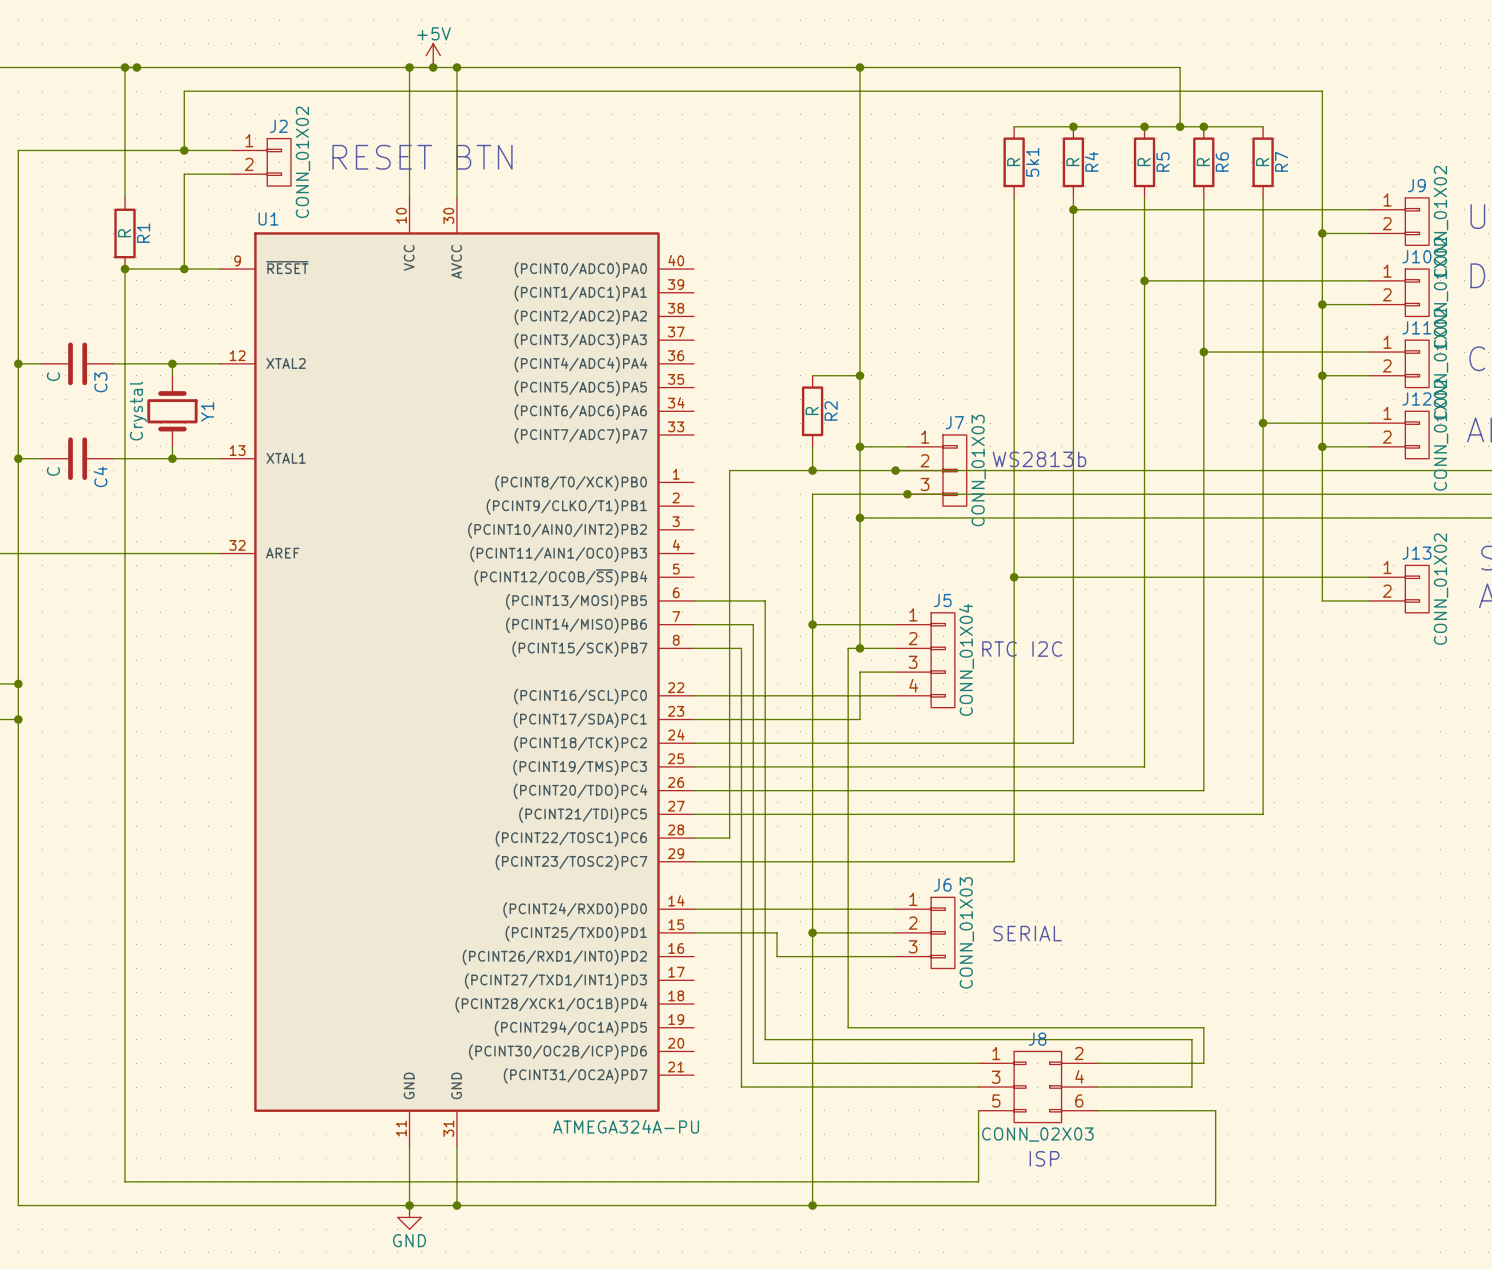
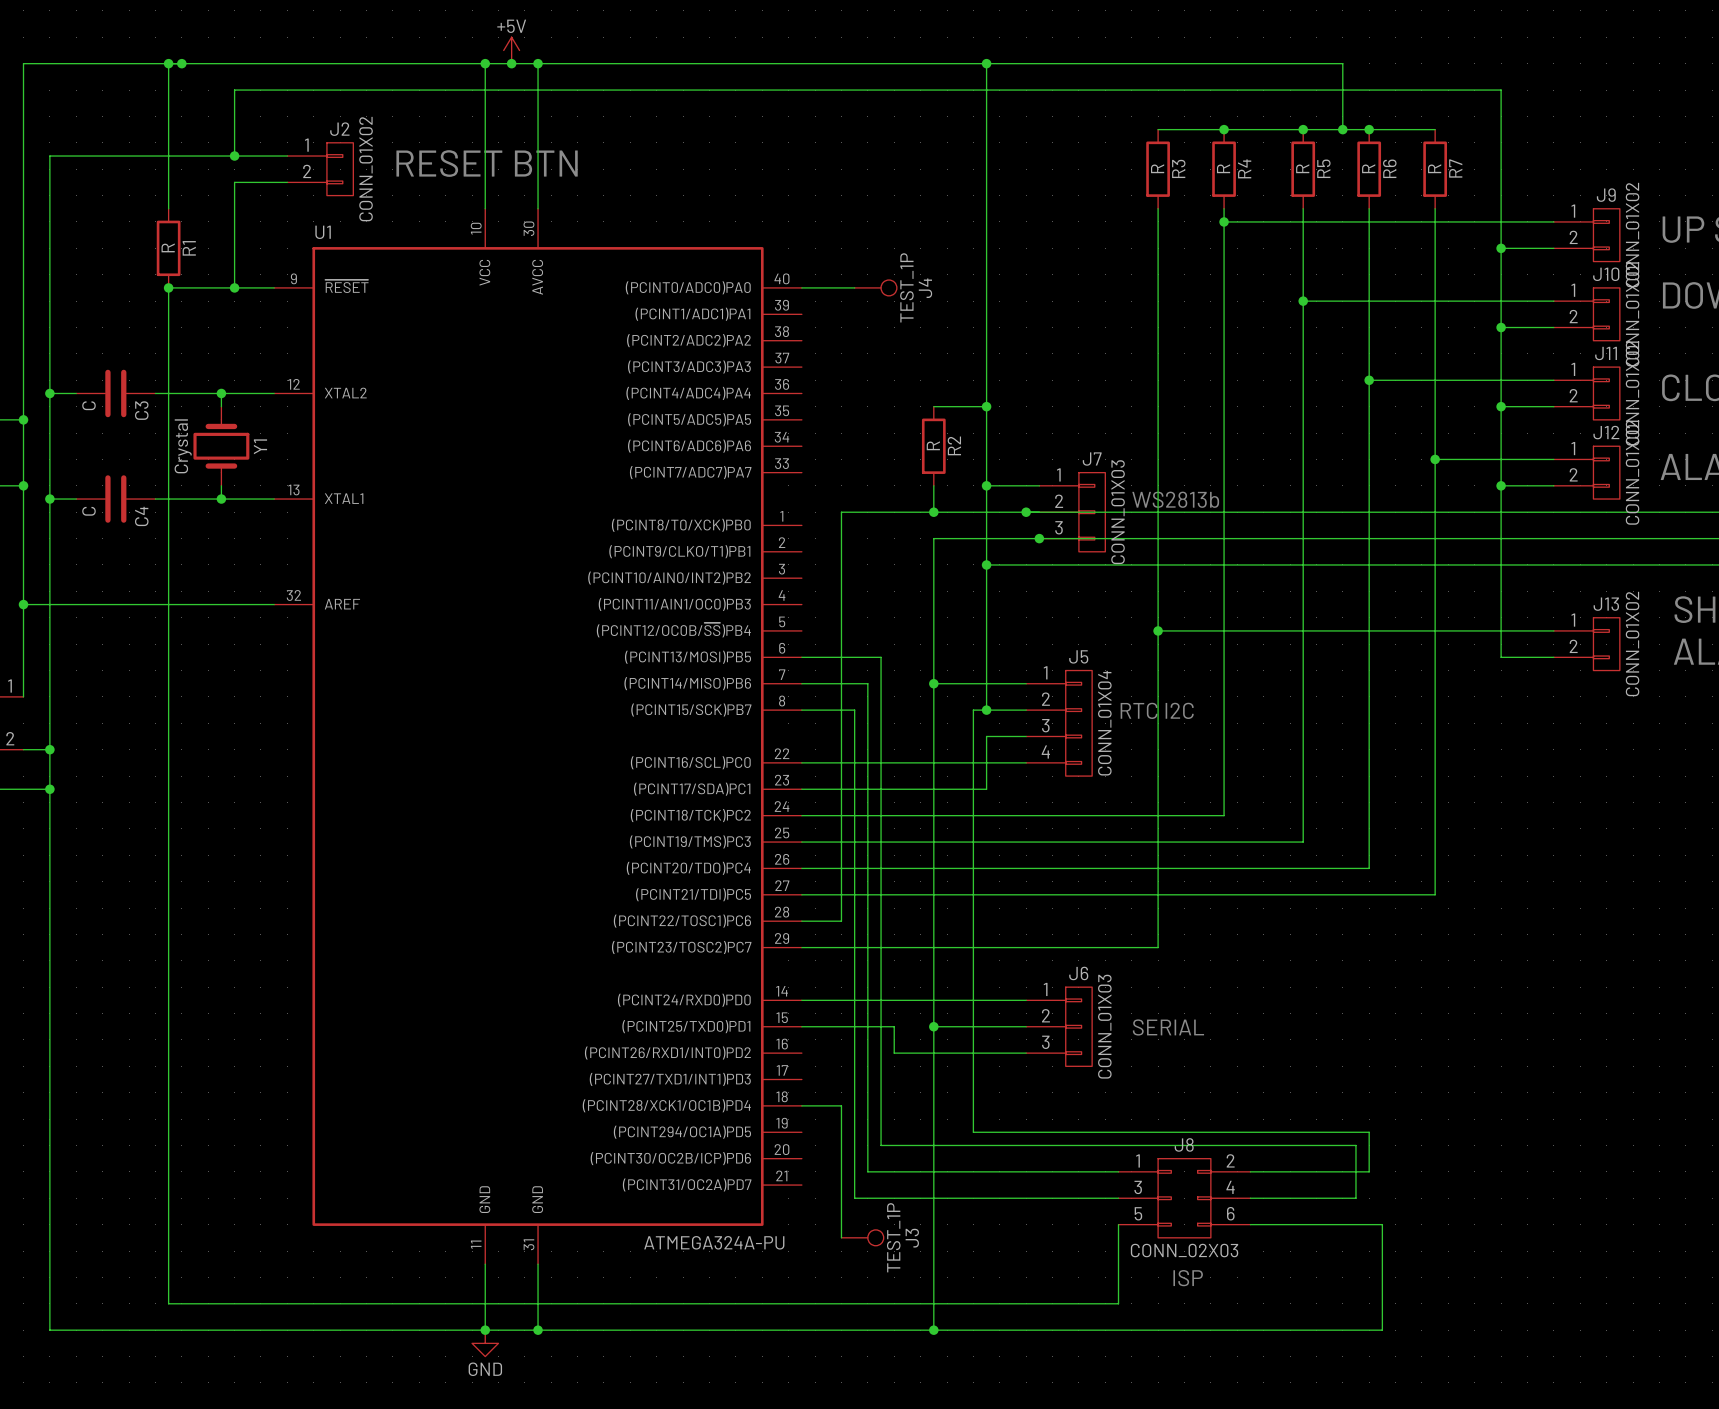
5k1 name: 5k1 (1032, 162) -> R3 (1178, 168)
wire: none -> (801, 287) (854, 287)
J4: none -> TEST_1P (875, 287)
wire: none -> (801, 1105) (841, 1105) (841, 1237)
J3: none -> TEST_1P (862, 1237)

